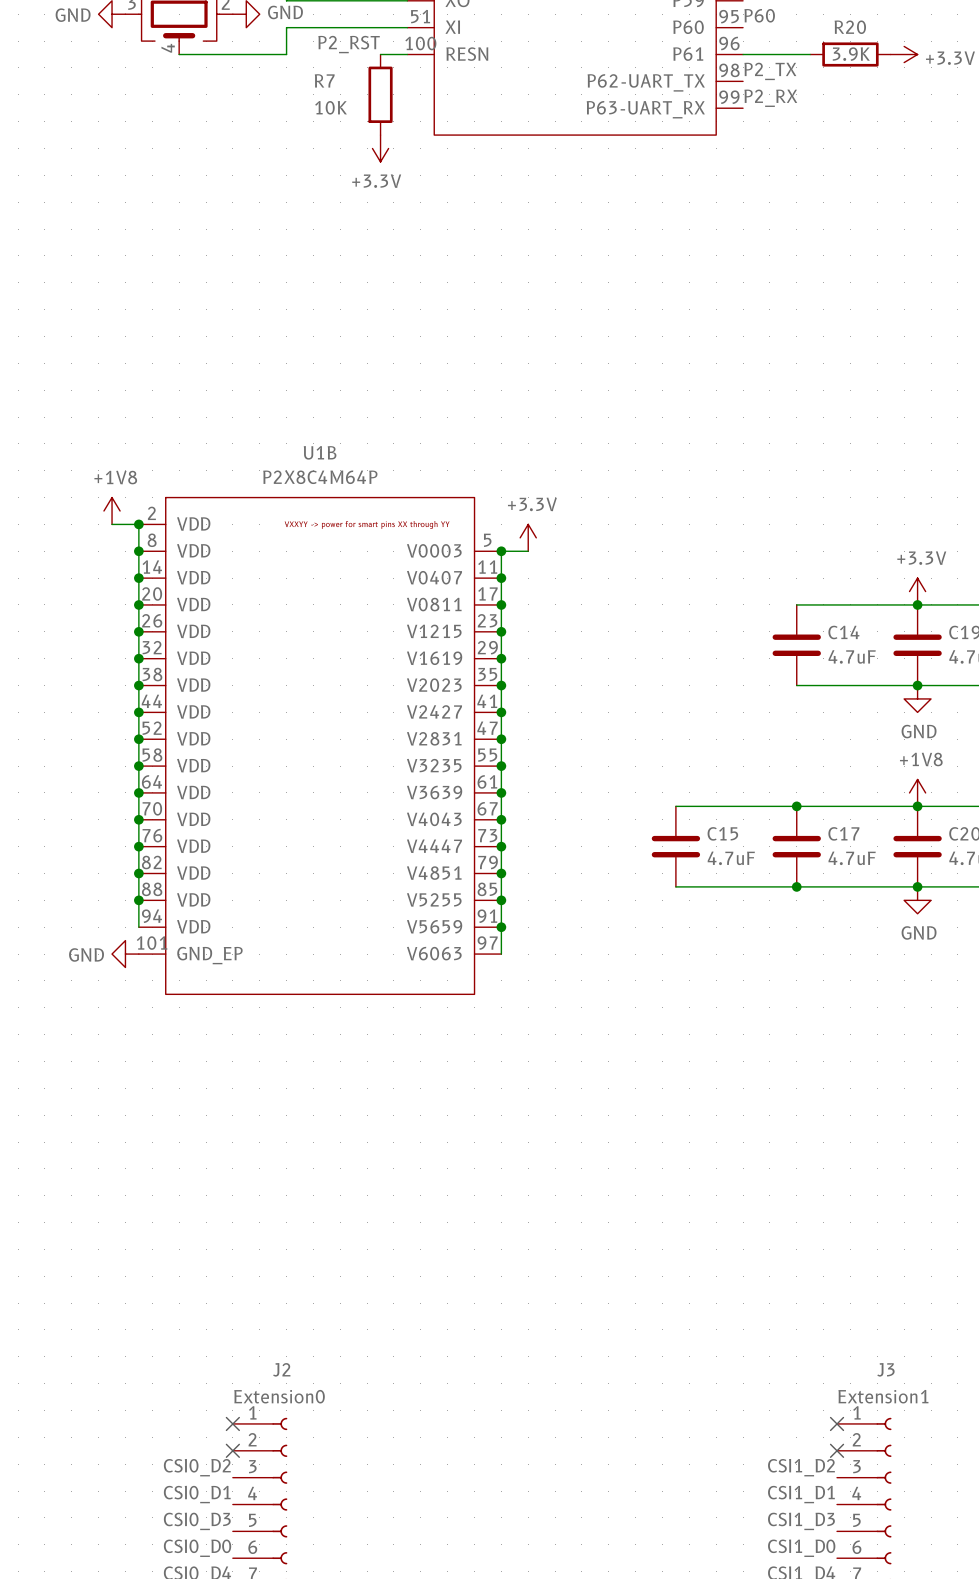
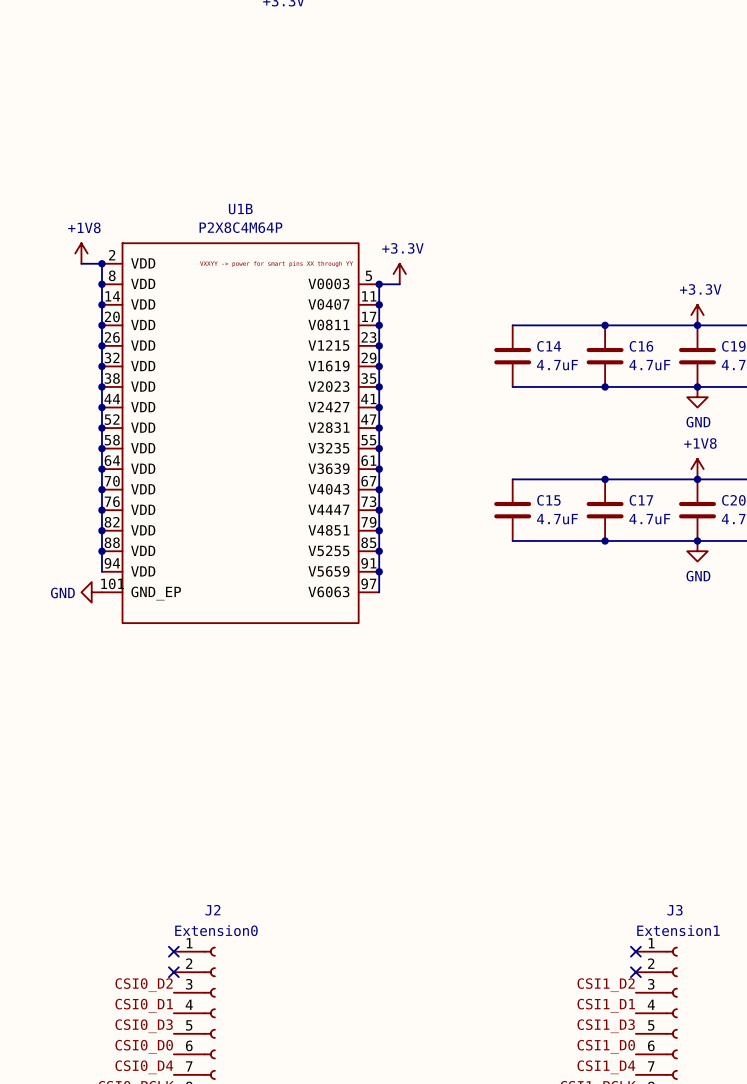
wire: none -> (512, 325) (605, 325)
junction: none -> (605, 325)
C14 name: C14 (843, 632) -> C16 (641, 346)
C14: none -> 4.7uF (512, 356)
wire: none -> (512, 386) (605, 386)
junction: none -> (605, 386)

